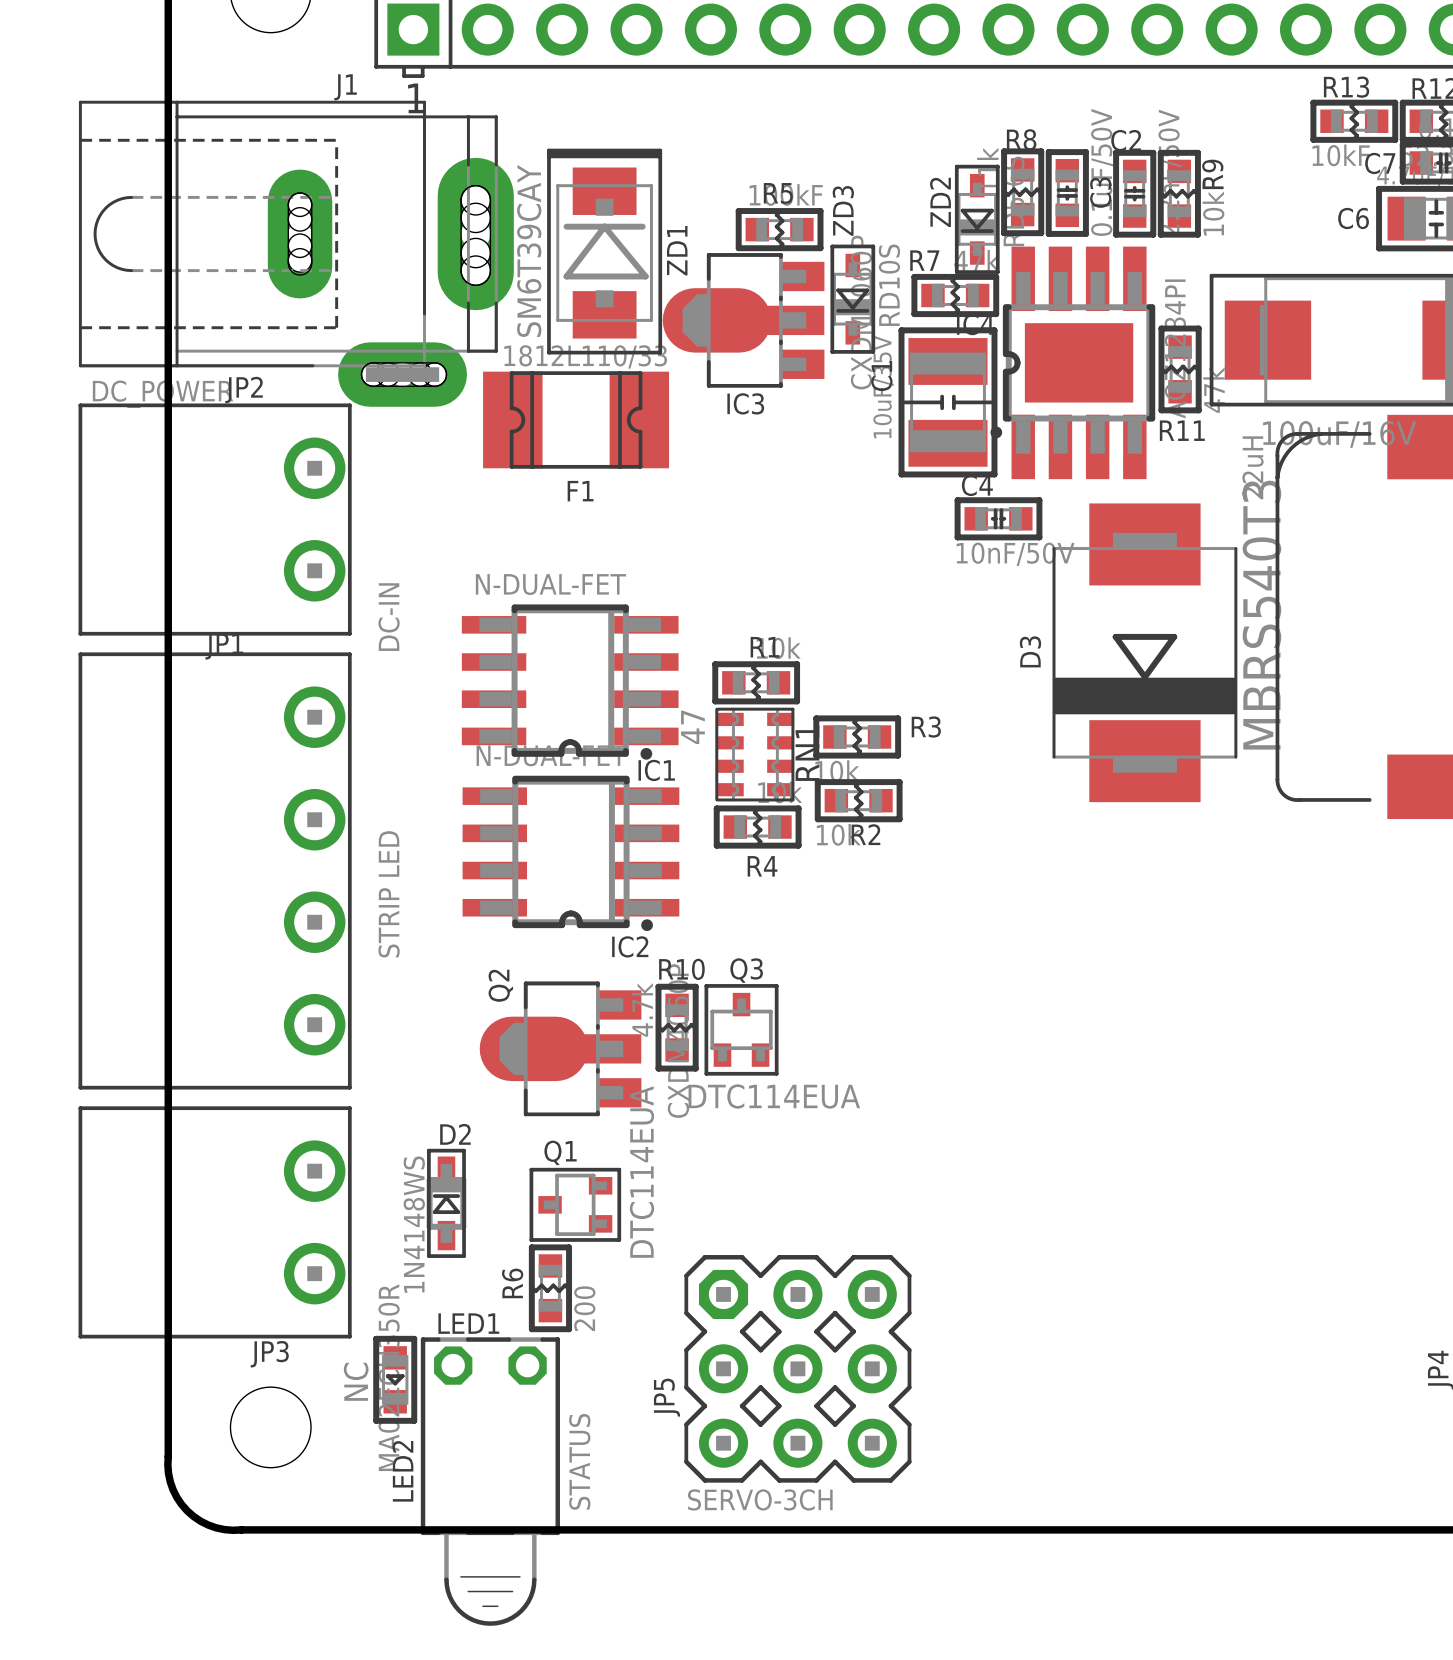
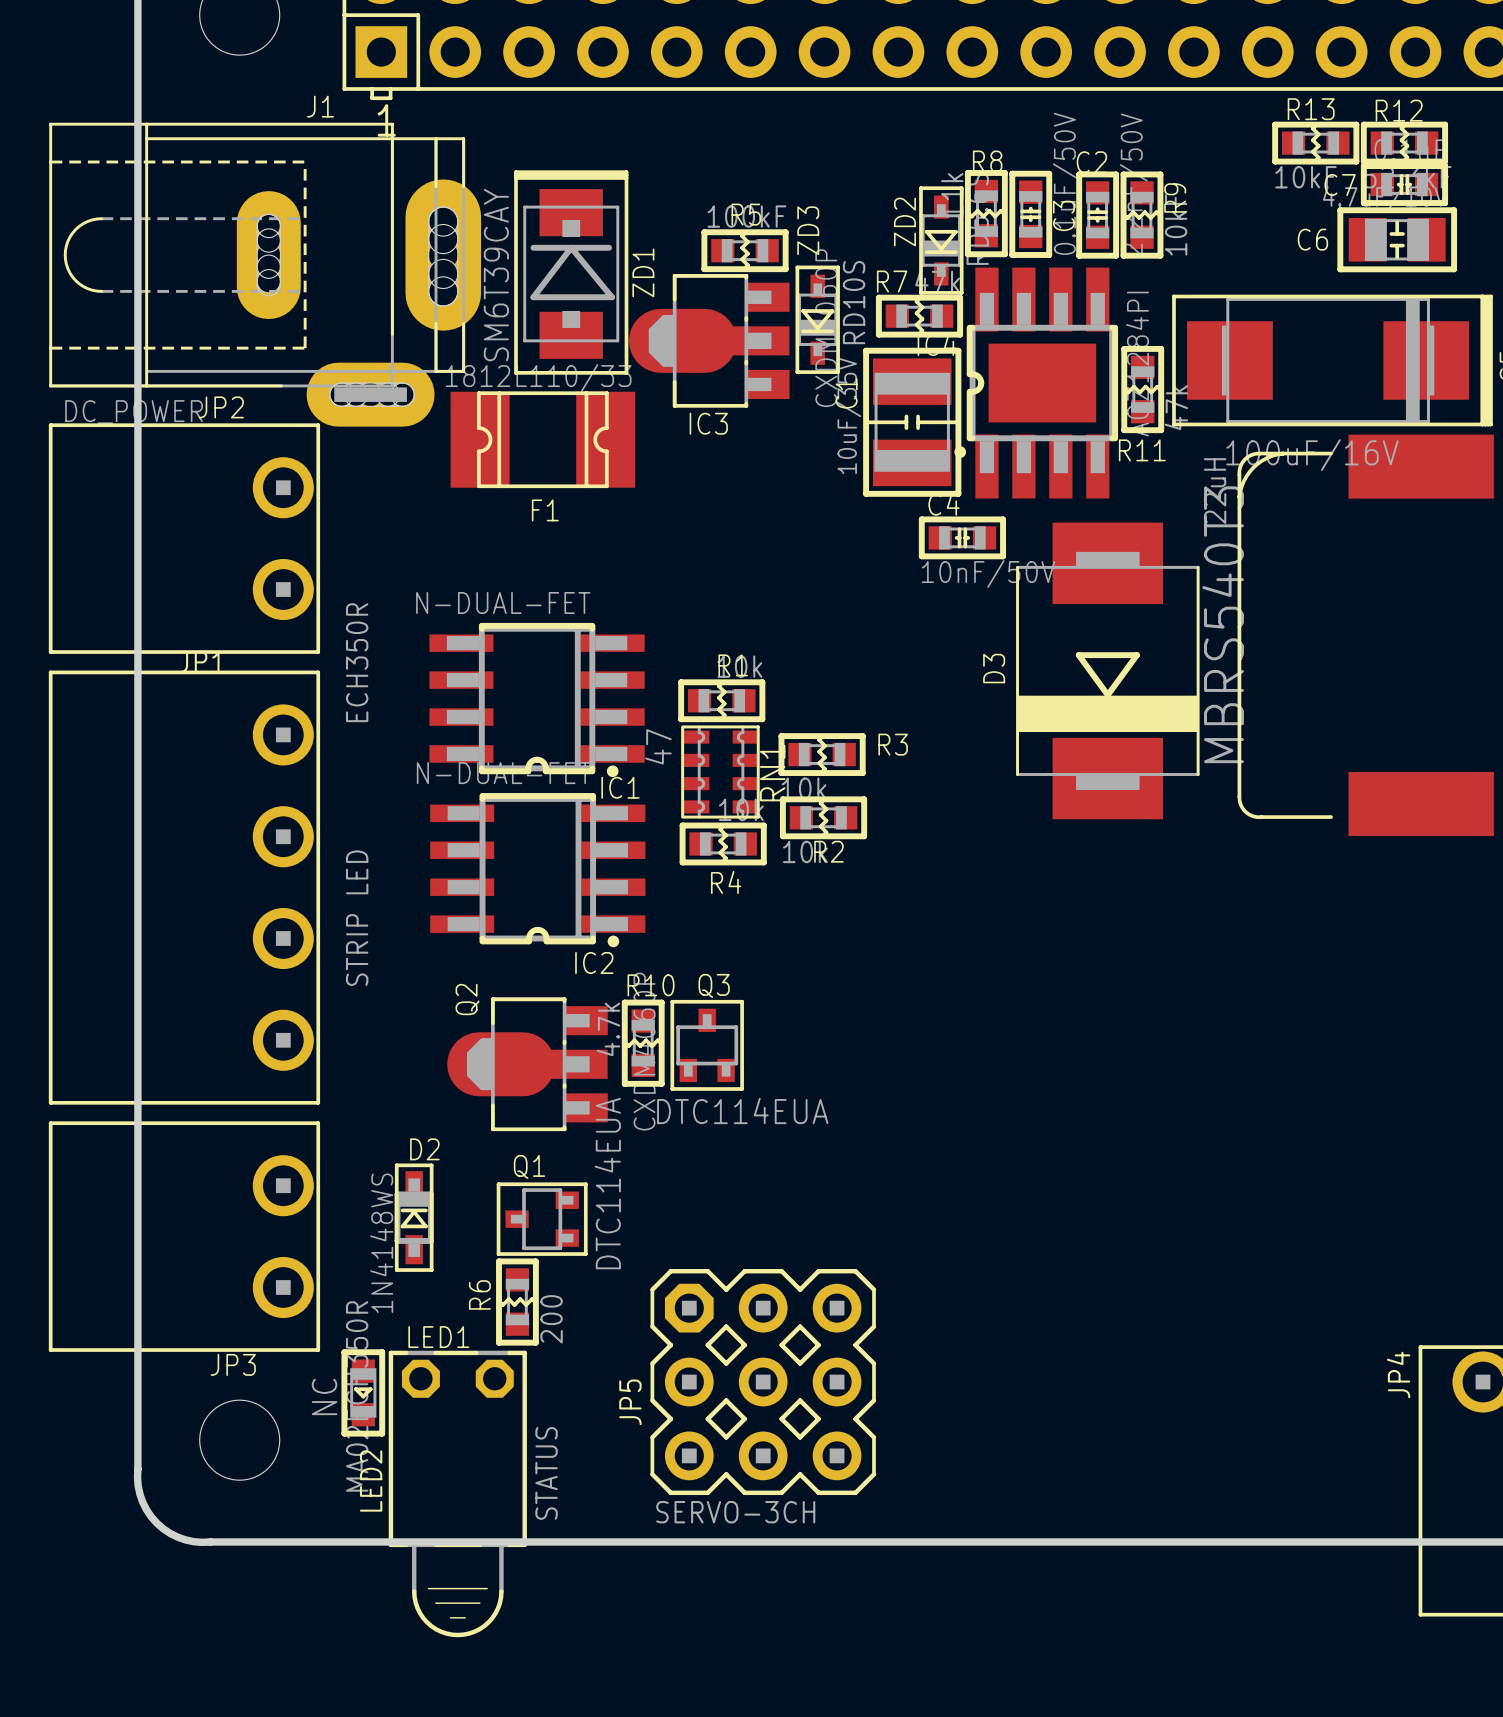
JP2 value: DC-IN (389, 617) -> ECH350R (357, 662)

